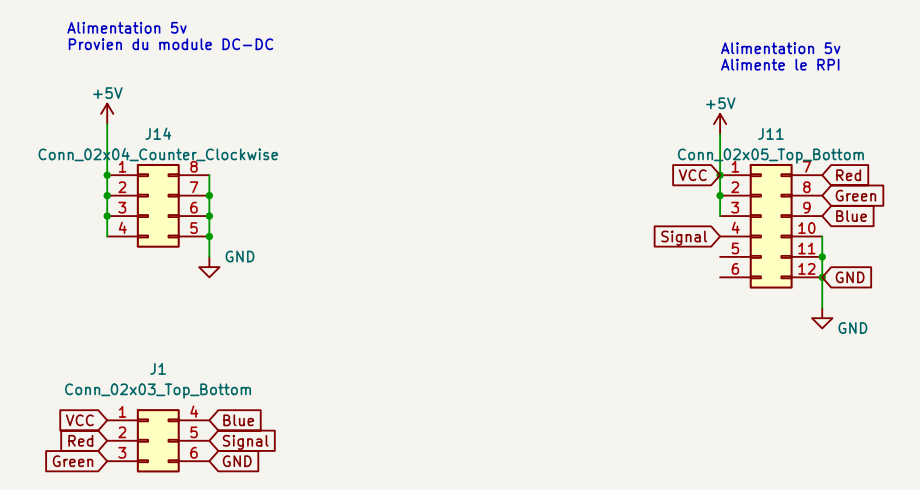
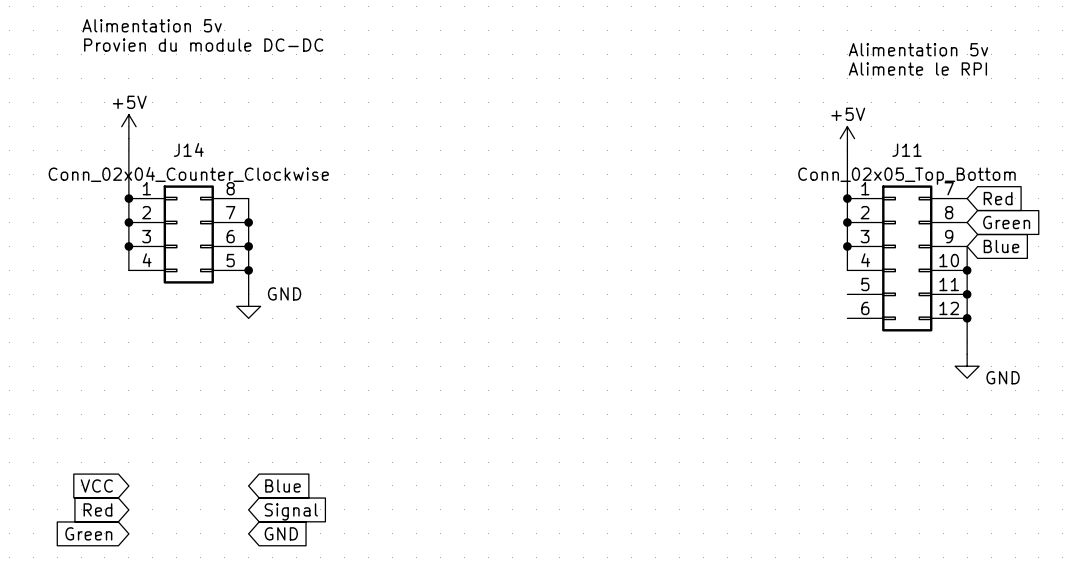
global label: VCC (692, 175) -> none
wire: none -> (847, 246) (847, 270)
junction: none -> (847, 246)
wire: none -> (967, 246) (967, 270)
junction: none -> (967, 270)
global label: Signal (684, 238) -> none
global label: GND (850, 277) -> none
J1: Conn_02x03_Top_Bottom (158, 440) -> none

